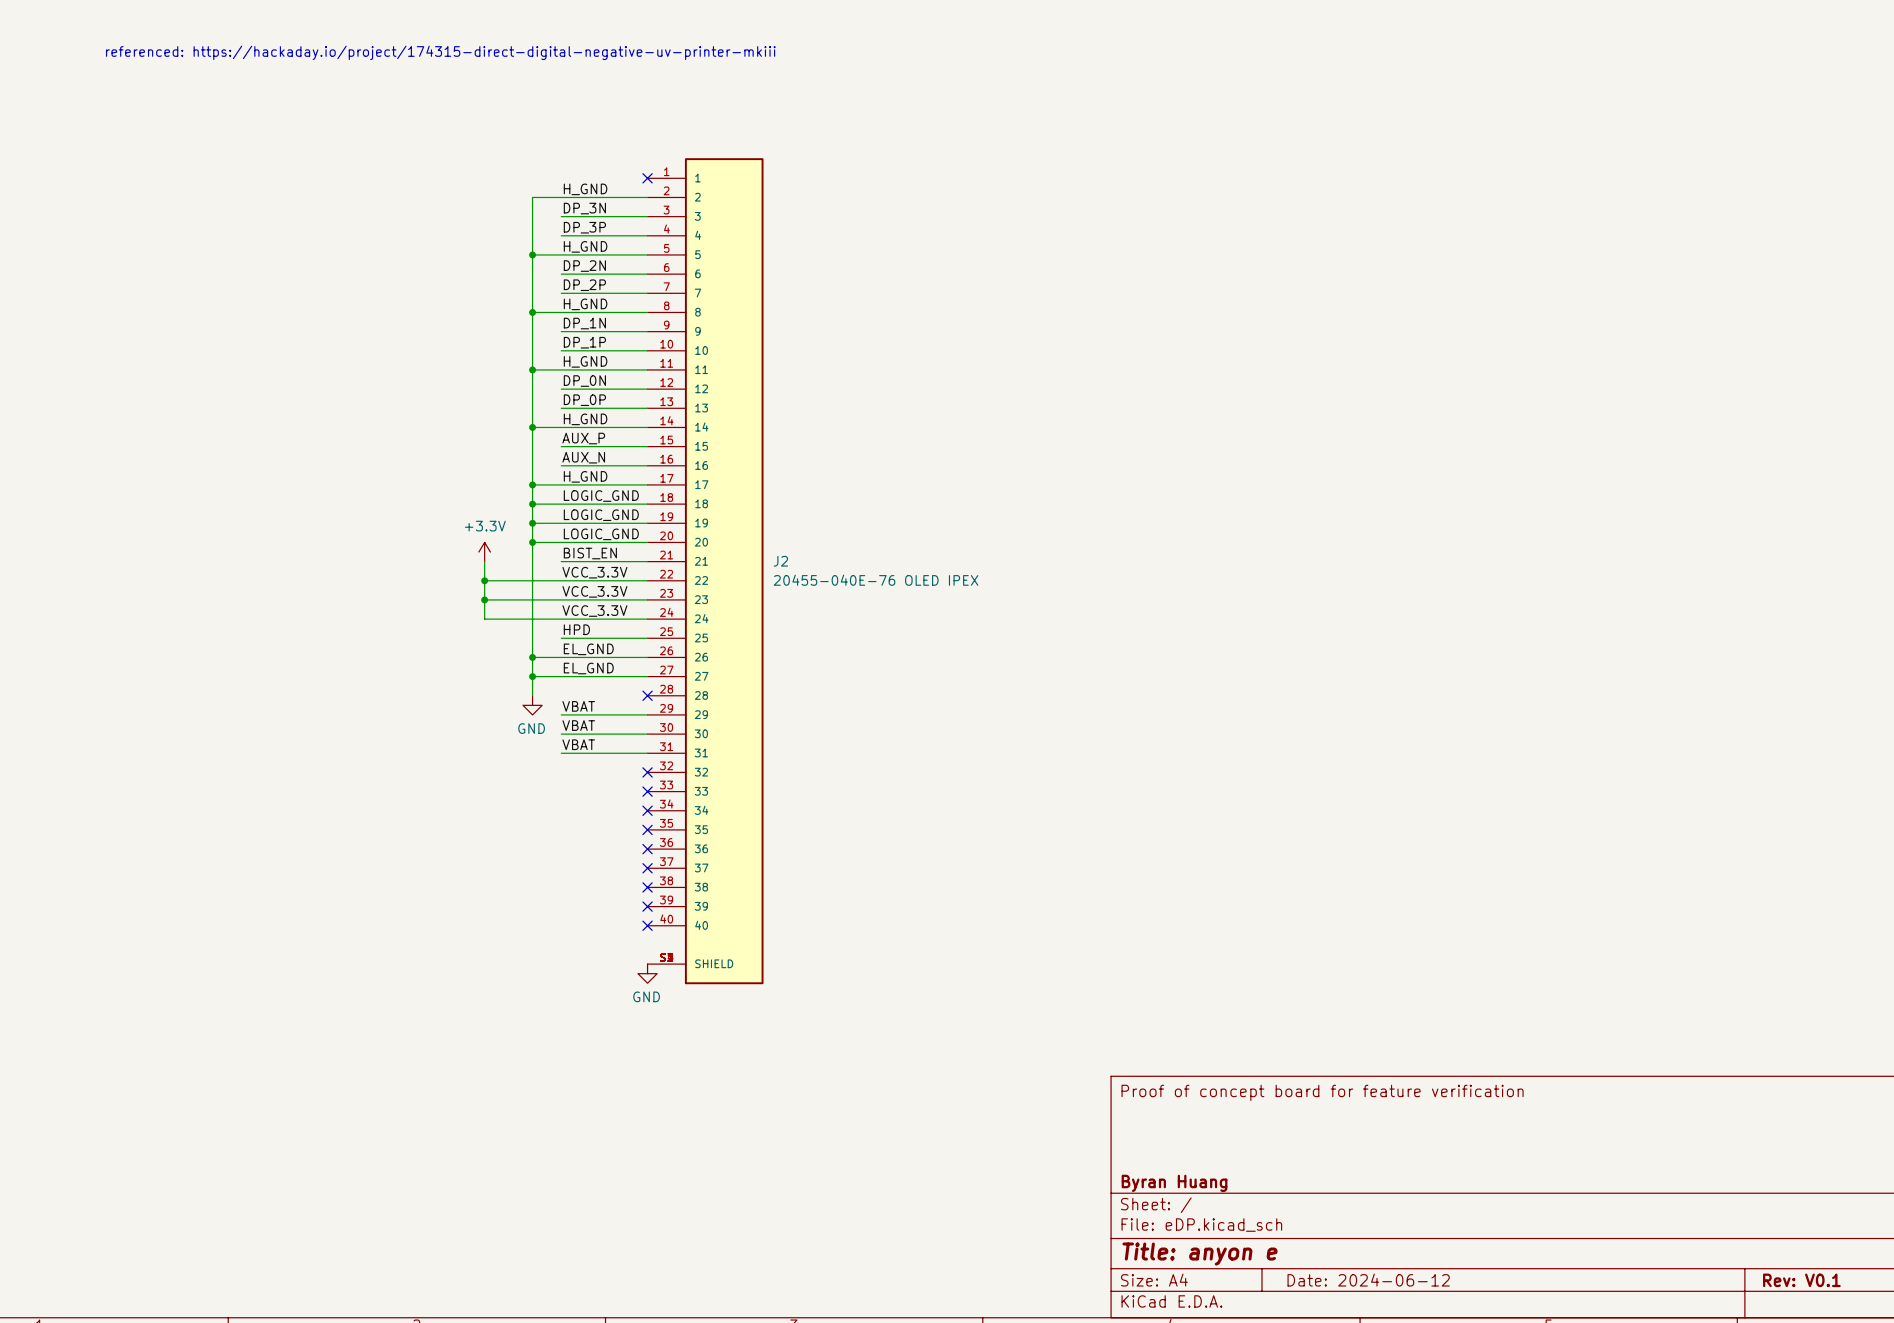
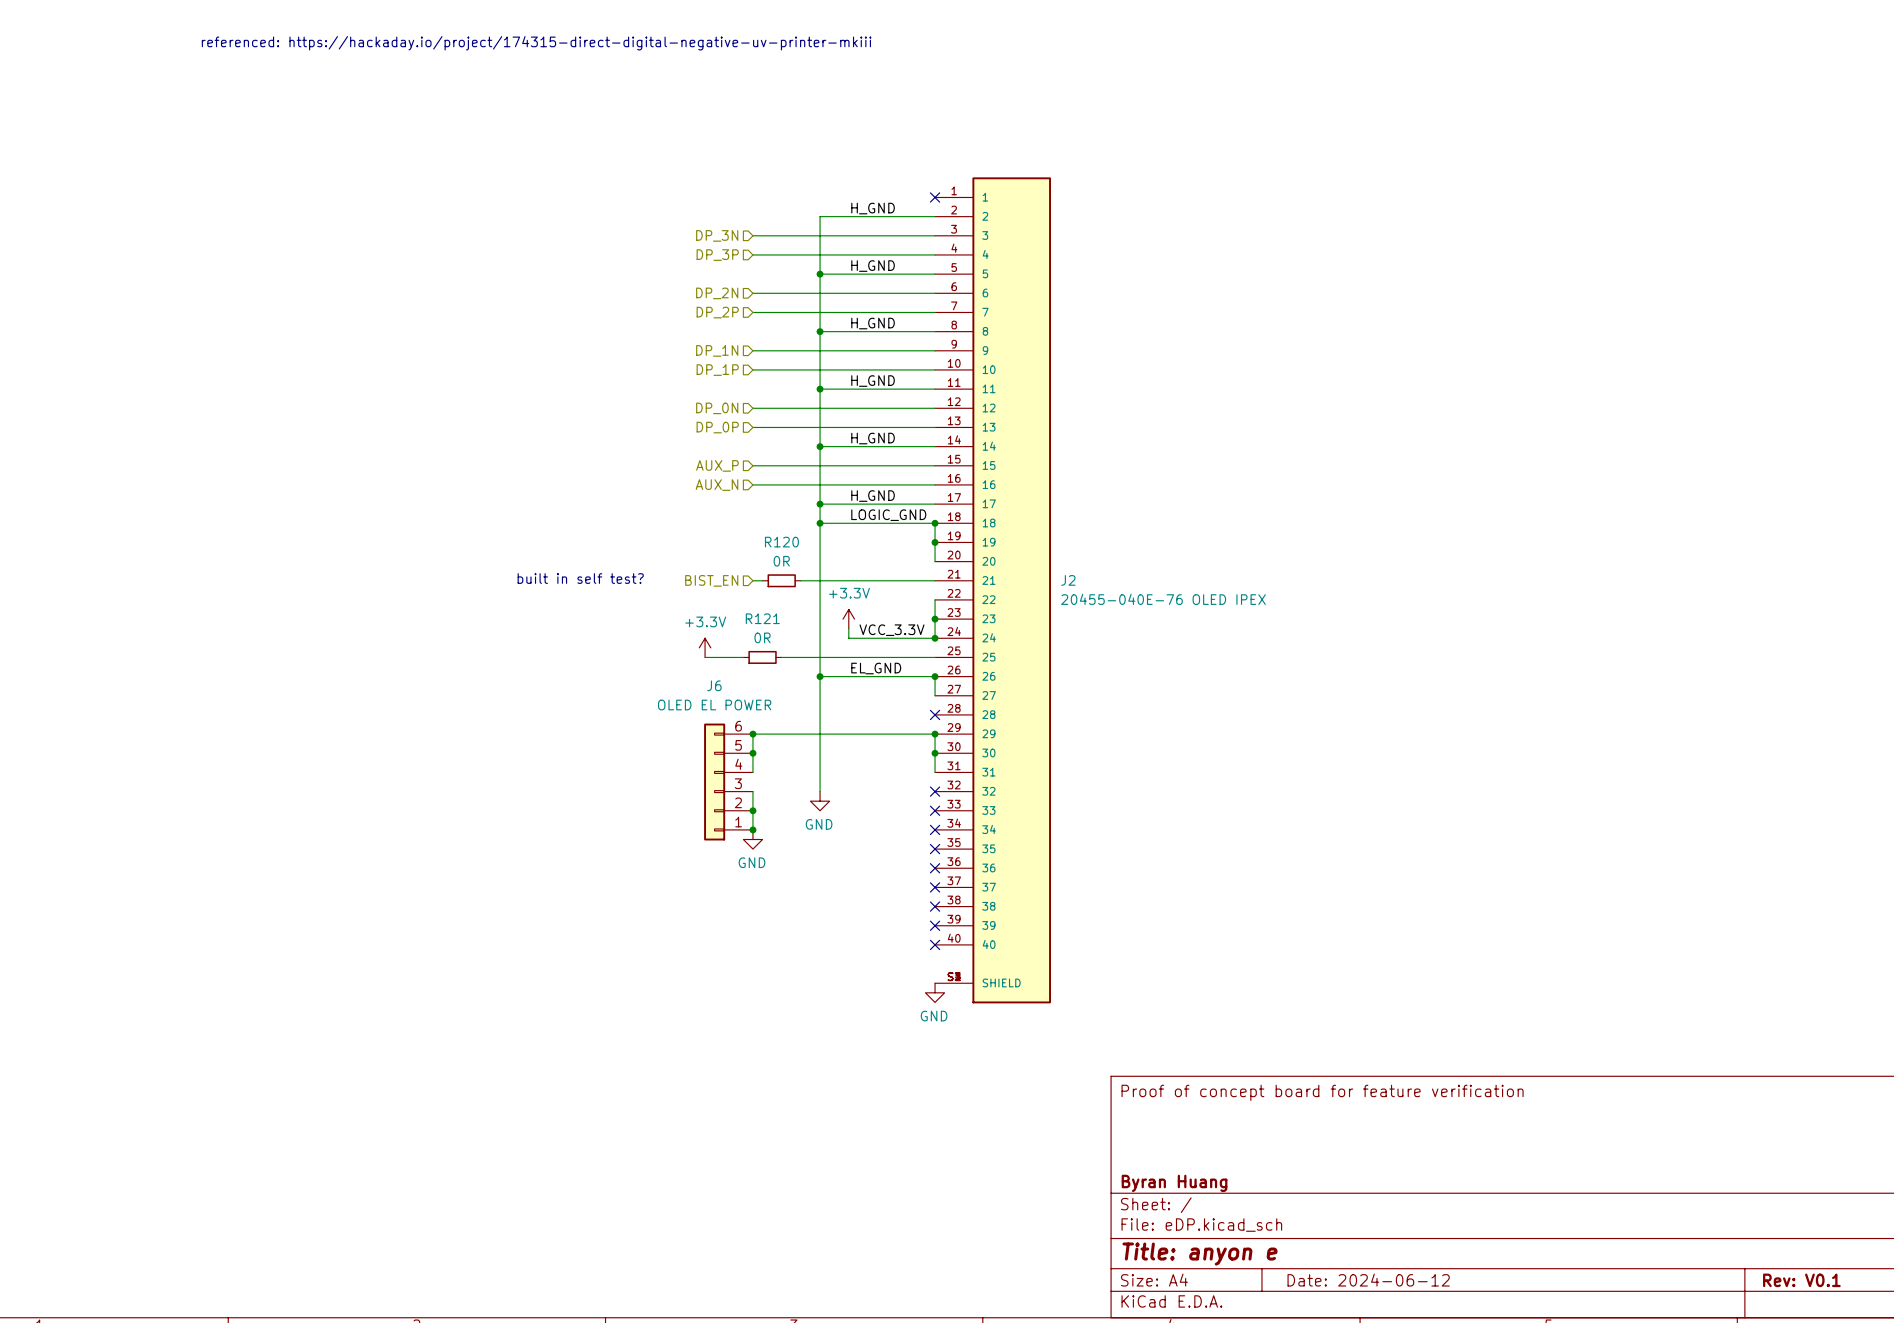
text position: referenced: https://hackaday.io/project/174315-direct-digital-negative-uv-printer-mkiii (440, 52) -> referenced: https://hackaday.io/project/174315-direct-digital-negative-uv-printer-mkiii (536, 43)
no-connect mark: (647, 178) -> none
label: H_GND (585, 189) -> none
wire: (647, 197) (532, 197) (532, 695) -> none
no-connect mark: none -> (935, 197)
label: DP_3N (584, 208) -> none
label: none -> H_GND (873, 208)
wire: (561, 216) (647, 216) -> none
wire: none -> (935, 216) (820, 216) (820, 791)
label: DP_3P (584, 227) -> none
wire: (561, 235) (647, 235) -> none
hierarchical label: none -> DP_3N (717, 235)
wire: none -> (752, 235) (935, 235)
label: H_GND (585, 246) -> none
wire: (532, 254) (647, 254) -> none
junction: (532, 254) -> none
wire: none -> (752, 254) (935, 254)
hierarchical label: none -> DP_3P (717, 255)
label: DP_2N (584, 266) -> none
label: none -> H_GND (873, 266)
wire: (561, 274) (647, 274) -> none
wire: none -> (820, 274) (935, 274)
junction: none -> (820, 274)
label: DP_2P (584, 285) -> none
wire: (561, 293) (647, 293) -> none
hierarchical label: none -> DP_2N (717, 293)
wire: none -> (752, 293) (935, 293)
label: H_GND (585, 304) -> none
wire: (532, 312) (647, 312) -> none
junction: (532, 312) -> none
hierarchical label: none -> DP_2P (717, 312)
wire: none -> (752, 312) (935, 312)
label: DP_1N (584, 323) -> none
label: none -> H_GND (873, 323)
wire: (561, 331) (647, 331) -> none
wire: none -> (820, 331) (935, 331)
junction: none -> (820, 331)
label: DP_1P (584, 342) -> none
wire: (561, 350) (647, 350) -> none
hierarchical label: none -> DP_1N (717, 350)
wire: none -> (752, 350) (935, 350)
label: H_GND (585, 361) -> none
wire: (532, 369) (647, 369) -> none
junction: (532, 369) -> none
wire: none -> (752, 369) (935, 369)
hierarchical label: none -> DP_1P (717, 370)
label: DP_0N (584, 381) -> none
label: none -> H_GND (873, 381)
wire: (561, 389) (647, 389) -> none
wire: none -> (820, 389) (935, 389)
junction: none -> (820, 389)
label: DP_0P (584, 400) -> none
wire: (561, 408) (647, 408) -> none
hierarchical label: none -> DP_0N (717, 408)
wire: none -> (752, 408) (935, 408)
label: H_GND (585, 419) -> none
wire: (532, 427) (647, 427) -> none
junction: (532, 427) -> none
hierarchical label: none -> DP_0P (717, 427)
wire: none -> (752, 427) (935, 427)
label: AUX_P (583, 438) -> none
label: none -> H_GND (873, 438)
wire: (561, 446) (647, 446) -> none
wire: none -> (820, 446) (935, 446)
junction: none -> (820, 446)
label: AUX_N (583, 457) -> none
wire: (561, 465) (647, 465) -> none
hierarchical label: none -> AUX_P (717, 465)
wire: none -> (752, 465) (935, 465)
label: H_GND (585, 476) -> none
wire: (532, 484) (647, 484) -> none
junction: (532, 484) -> none
wire: none -> (752, 484) (935, 484)
hierarchical label: none -> AUX_N (716, 485)
label: LOGIC_GND (601, 496) -> none
label: none -> H_GND (873, 496)
wire: (532, 504) (647, 504) -> none
junction: (532, 504) -> none
wire: none -> (820, 504) (935, 504)
junction: none -> (820, 504)
label: LOGIC_GND (601, 515) -> none
label: none -> LOGIC_GND (888, 515)
wire: (532, 523) (647, 523) -> none
junction: (532, 523) -> none
wire: none -> (820, 523) (935, 523) (935, 561)
junction: none -> (820, 523)
junction: none -> (935, 523)
label: LOGIC_GND (601, 534) -> none
wire: (532, 542) (647, 542) -> none
junction: (532, 542) -> none
junction: none -> (935, 542)
power symbol: +3.3V (484, 552) -> none
label: BIST_EN (590, 553) -> none
wire: (484, 561) (484, 619) (647, 619) -> none
wire: (561, 561) (647, 561) -> none
J2 position: (705, 571) -> (993, 590)
label: VCC_3.3V (594, 572) -> none
text: none -> built in self test? (580, 578)
wire: (484, 580) (647, 580) -> none
junction: (484, 580) -> none
hierarchical label: none -> BIST_EN (711, 580)
R120: none -> 0R (781, 580)
wire: none -> (800, 580) (935, 580)
label: VCC_3.3V (594, 591) -> none
wire: (484, 599) (647, 599) -> none
junction: (484, 599) -> none
wire: none -> (935, 599) (935, 638) (848, 638) (848, 628)
label: VCC_3.3V (594, 611) -> none
power symbol: none -> +3.3V (848, 619)
junction: none -> (935, 619)
label: HPD (576, 629) -> none
label: none -> VCC_3.3V (891, 630)
wire: (561, 638) (647, 638) -> none
junction: none -> (935, 638)
power symbol: none -> +3.3V (705, 647)
label: EL_GND (588, 649) -> none
wire: (532, 657) (647, 657) -> none
junction: (532, 657) -> none
R121: none -> 0R (762, 657)
wire: none -> (781, 657) (935, 657)
label: EL_GND (588, 668) -> none
label: none -> EL_GND (876, 668)
wire: (532, 676) (647, 676) -> none
junction: (532, 676) -> none
wire: none -> (820, 676) (935, 676) (935, 695)
junction: none -> (820, 676)
junction: none -> (935, 676)
no-connect mark: (647, 695) -> none
power symbol: GND (532, 705) -> none
label: VBAT (578, 706) -> none
wire: (561, 714) (647, 714) -> none
no-connect mark: none -> (935, 714)
label: VBAT (578, 725) -> none
wire: (561, 734) (647, 734) -> none
junction: none -> (752, 734)
junction: none -> (935, 734)
label: VBAT (578, 744) -> none
wire: (561, 753) (647, 753) -> none
junction: none -> (752, 753)
junction: none -> (935, 753)
no-connect mark: (647, 772) -> none
wire: none -> (752, 772) (752, 734) (935, 734) (935, 772)
J6: none -> OLED EL POWER (728, 782)
no-connect mark: (647, 791) -> none
no-connect mark: none -> (935, 791)
power symbol: none -> GND (820, 801)
no-connect mark: (647, 810) -> none
junction: none -> (752, 810)
no-connect mark: none -> (935, 810)
no-connect mark: (647, 829) -> none
junction: none -> (752, 829)
no-connect mark: none -> (935, 829)
power symbol: none -> GND (752, 839)
no-connect mark: (647, 849) -> none
no-connect mark: none -> (935, 849)
no-connect mark: (647, 868) -> none
no-connect mark: none -> (935, 868)
no-connect mark: (647, 887) -> none
no-connect mark: none -> (935, 887)
no-connect mark: (647, 906) -> none
no-connect mark: none -> (935, 906)
no-connect mark: (647, 925) -> none
no-connect mark: none -> (935, 925)
no-connect mark: none -> (935, 944)
power symbol: GND (647, 973) -> none
power symbol: none -> GND (935, 992)

